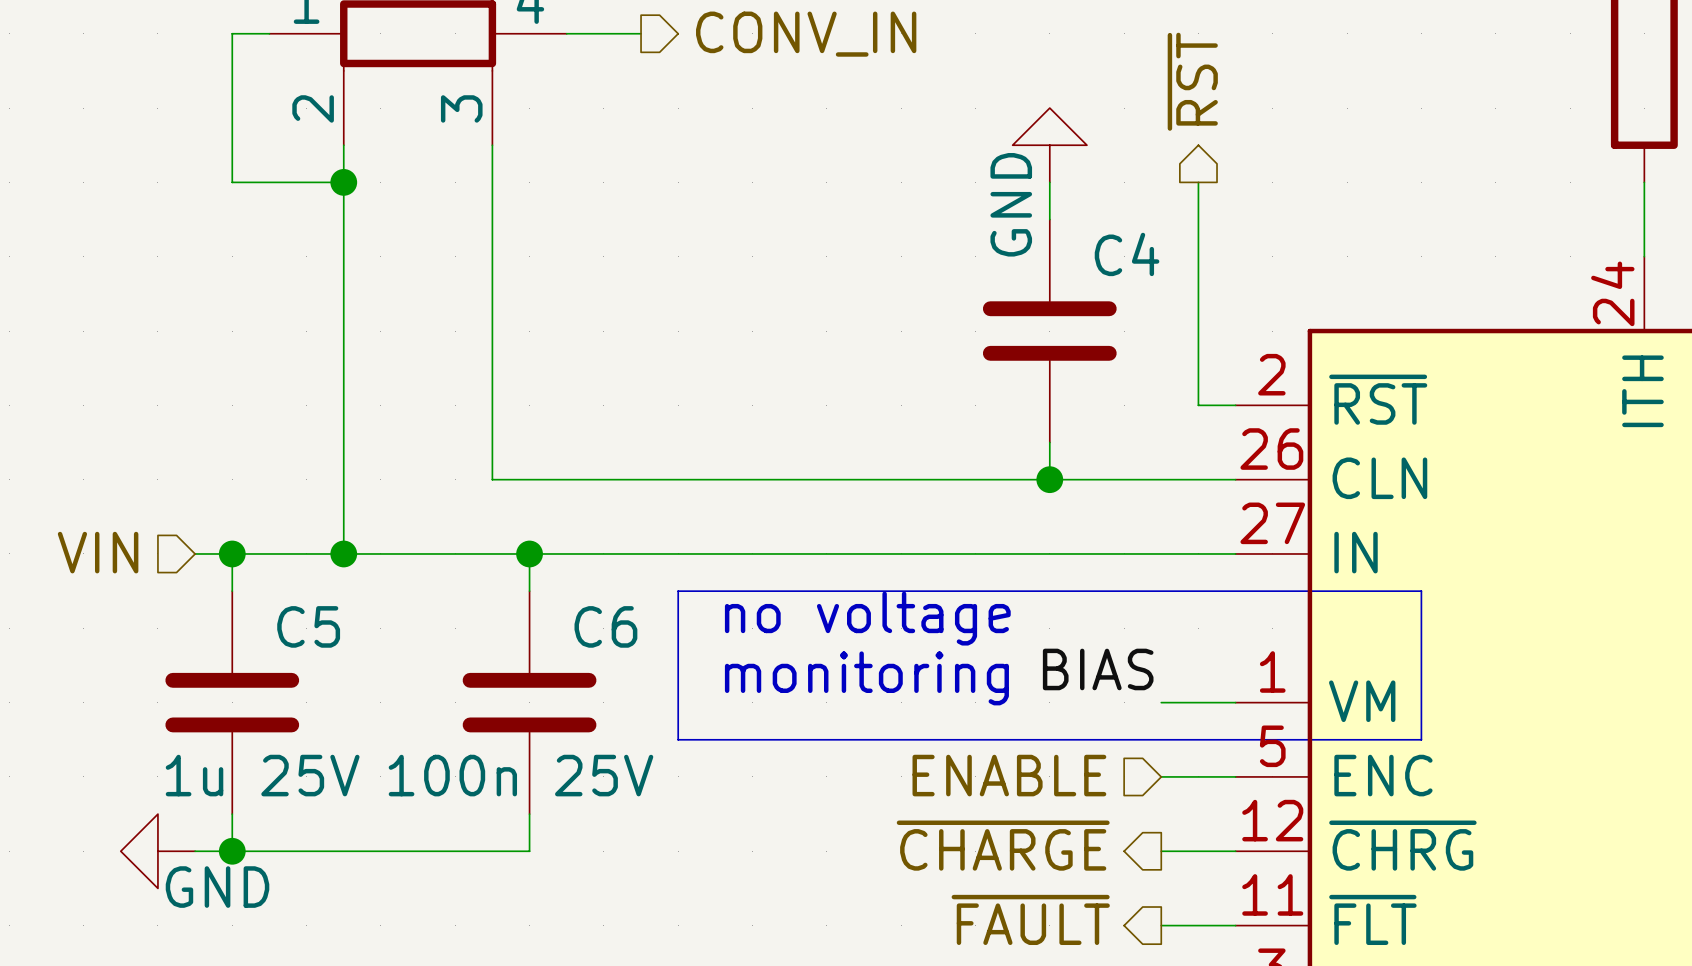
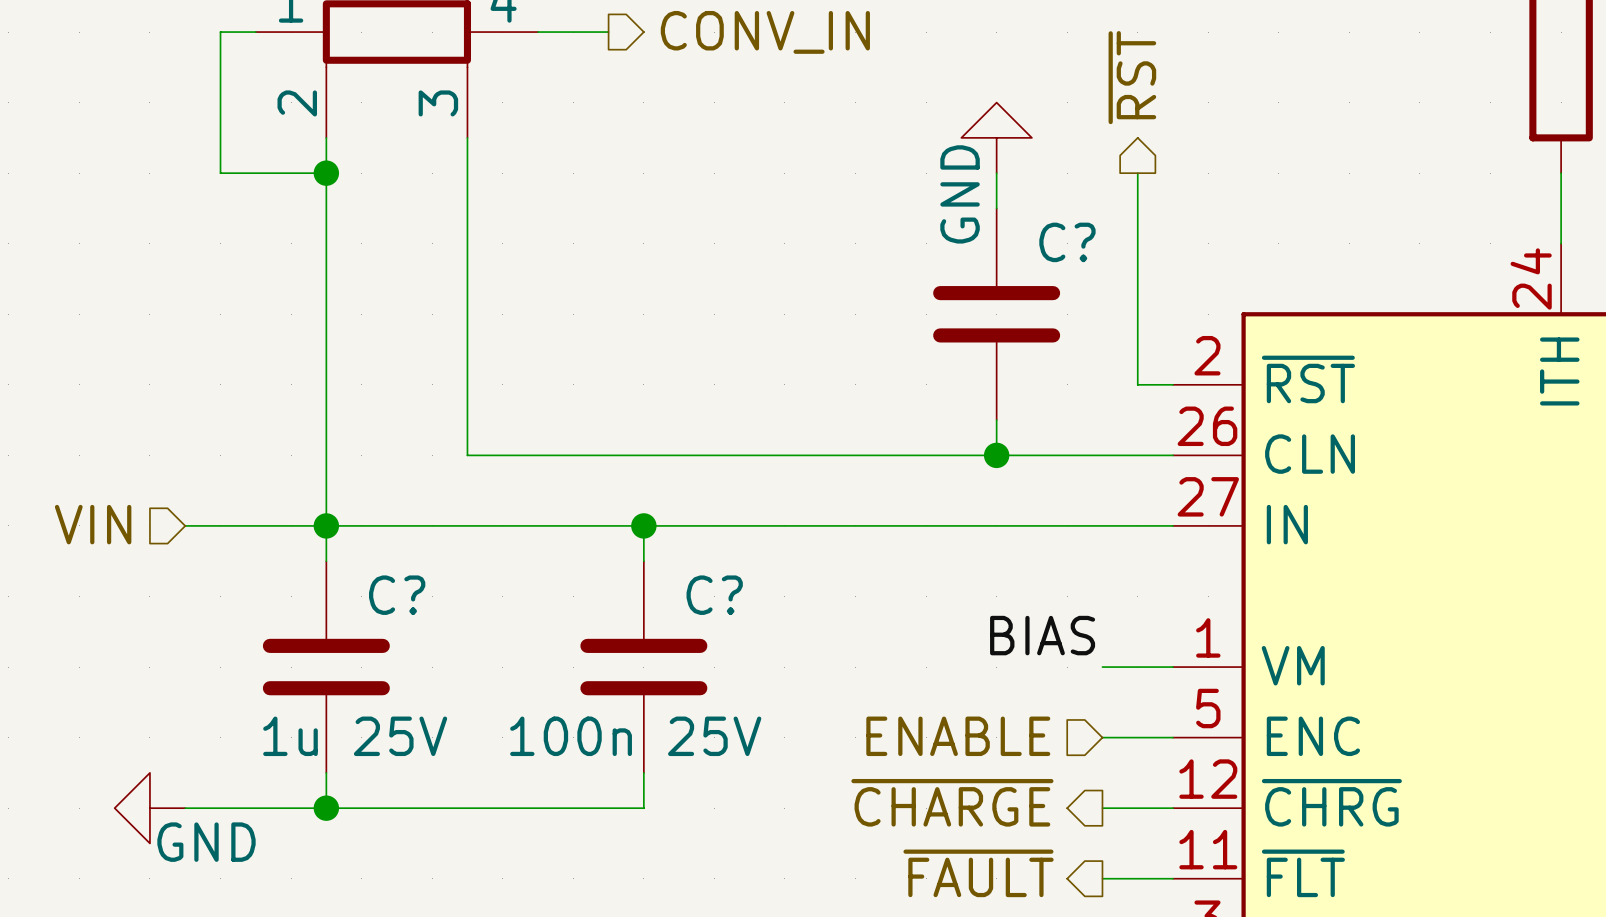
C4 name: C4 (1127, 254) -> C? (1067, 242)
wire: (232, 553) (232, 591) -> (326, 525) (326, 561)
junction: (232, 553) -> none
wire: (529, 553) (529, 591) -> (643, 525) (643, 561)
junction position: (529, 553) -> (643, 525)
line: (678, 591) (1421, 591) (1421, 739) (678, 739) (678, 591) -> none
text: no voltage (867, 618) -> none
text: monitoring (866, 678) -> none
C5: 1u 25V (232, 702) -> none
C?: none -> 1u 25V (326, 667)
C6: 100n 25V (529, 702) -> none
C?: none -> 100n 25V (643, 667)
wire: (232, 814) (232, 851) -> (326, 772) (326, 808)
wire: (529, 814) (529, 851) -> (643, 772) (643, 808) (502, 808)
junction position: (232, 851) -> (326, 808)

